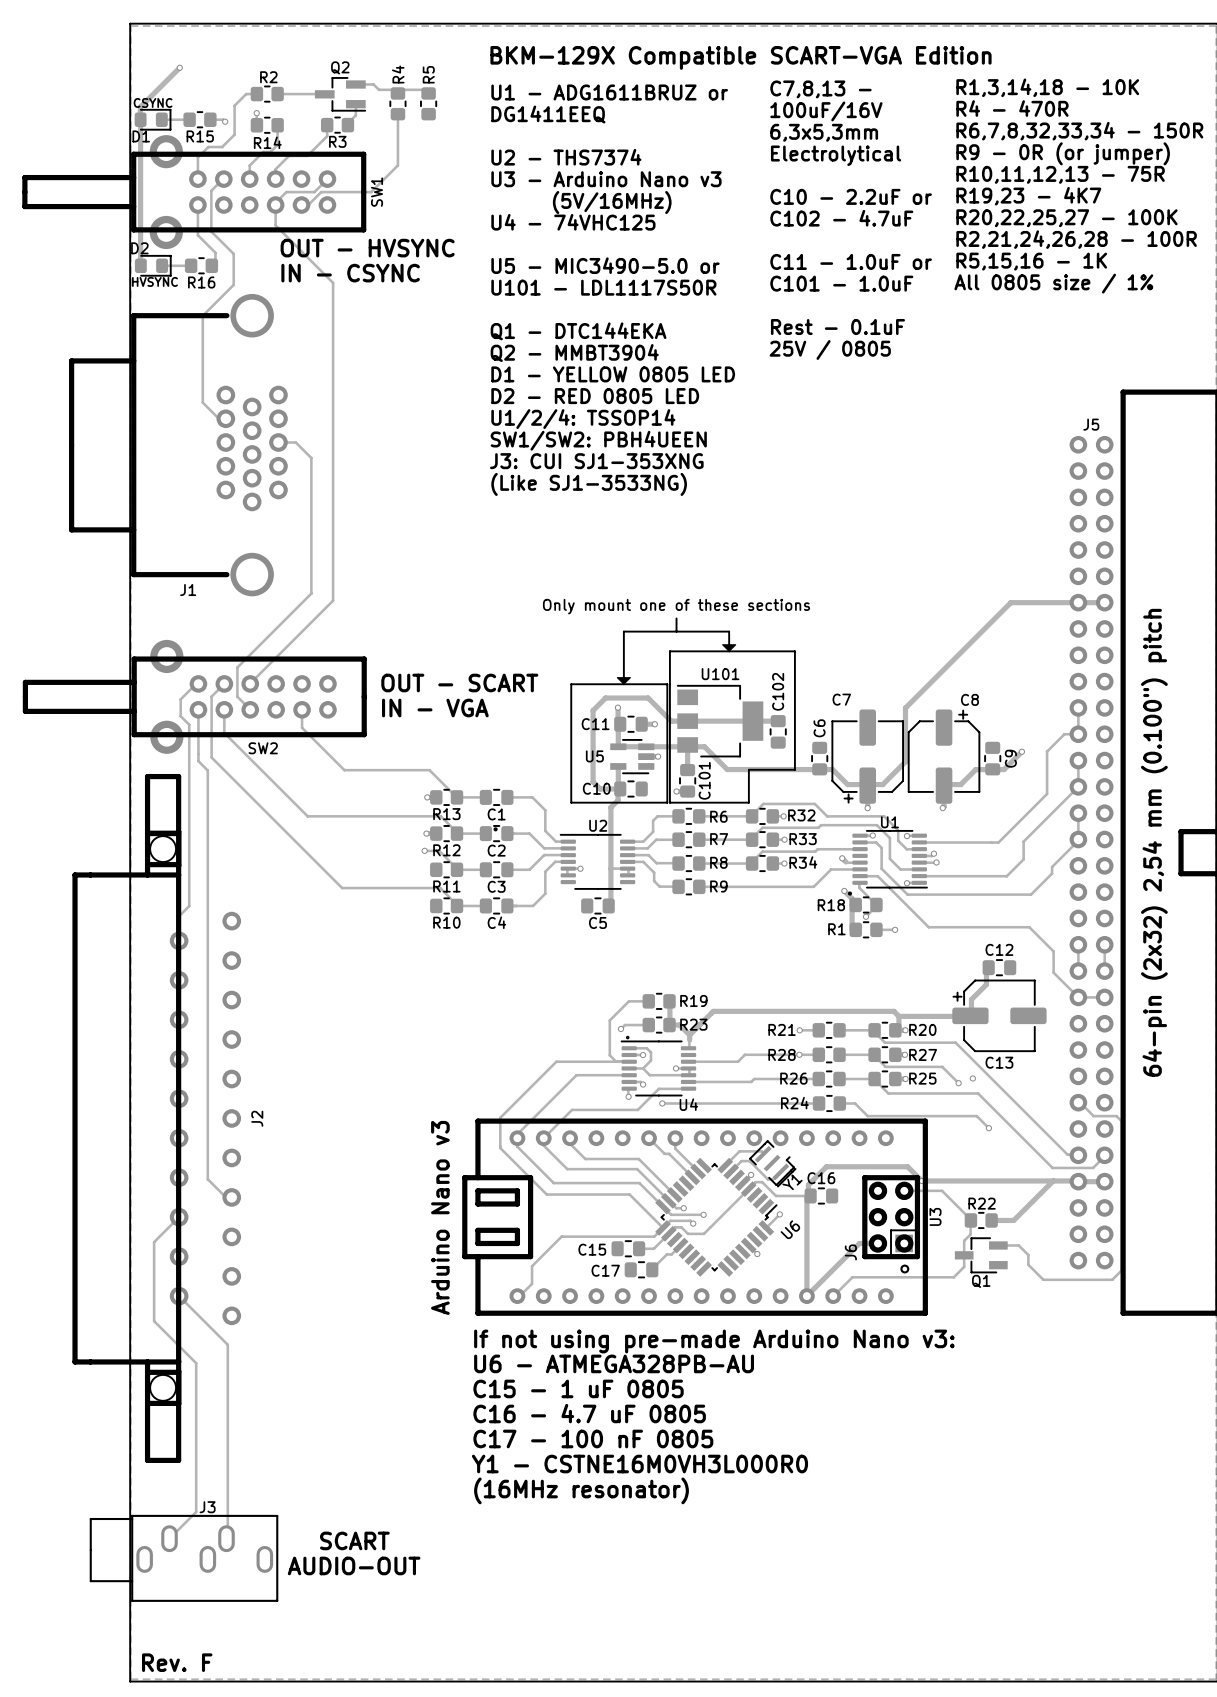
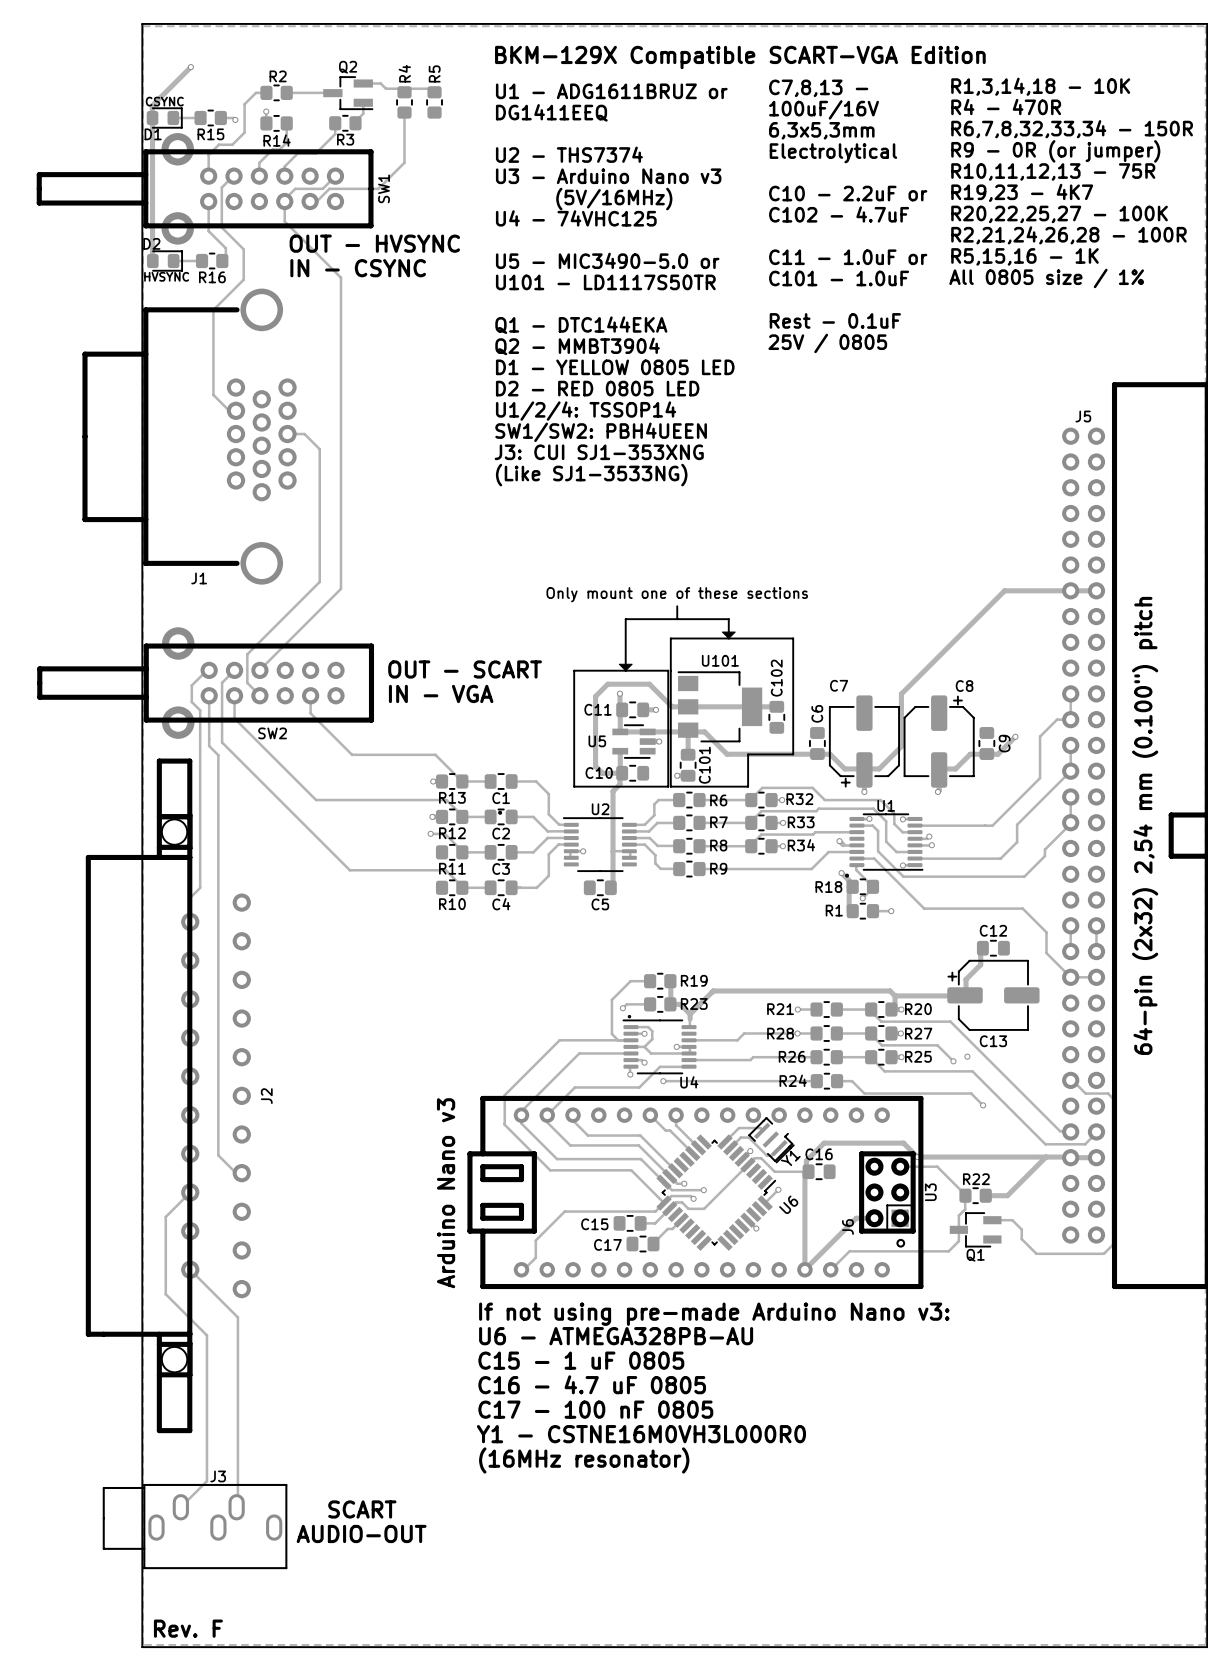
text: U101 - LDL1117S50R (603, 287) -> U101 - LD1117S50TR (605, 282)

